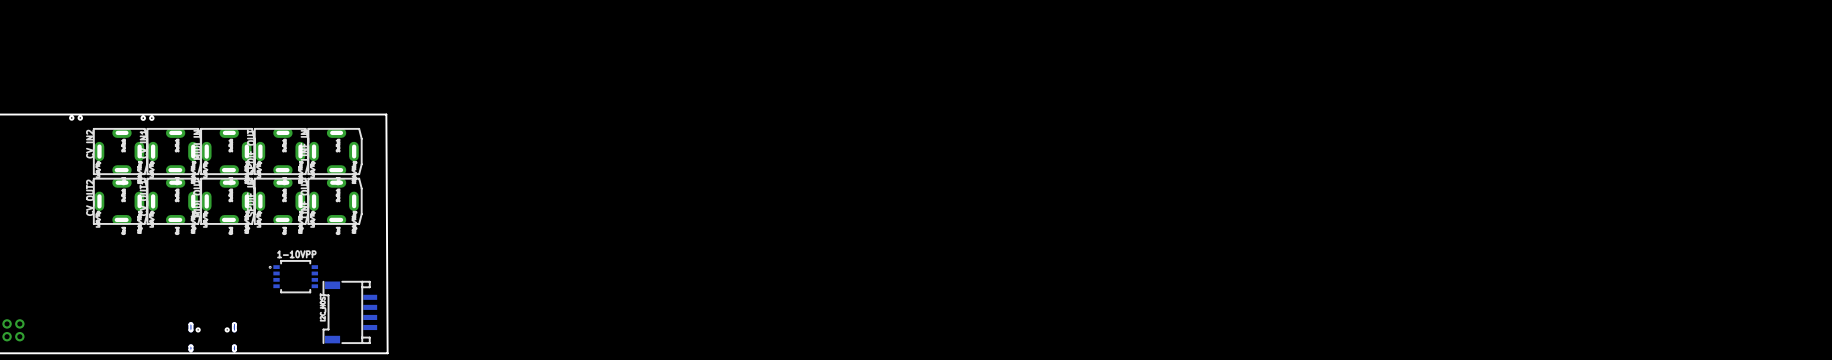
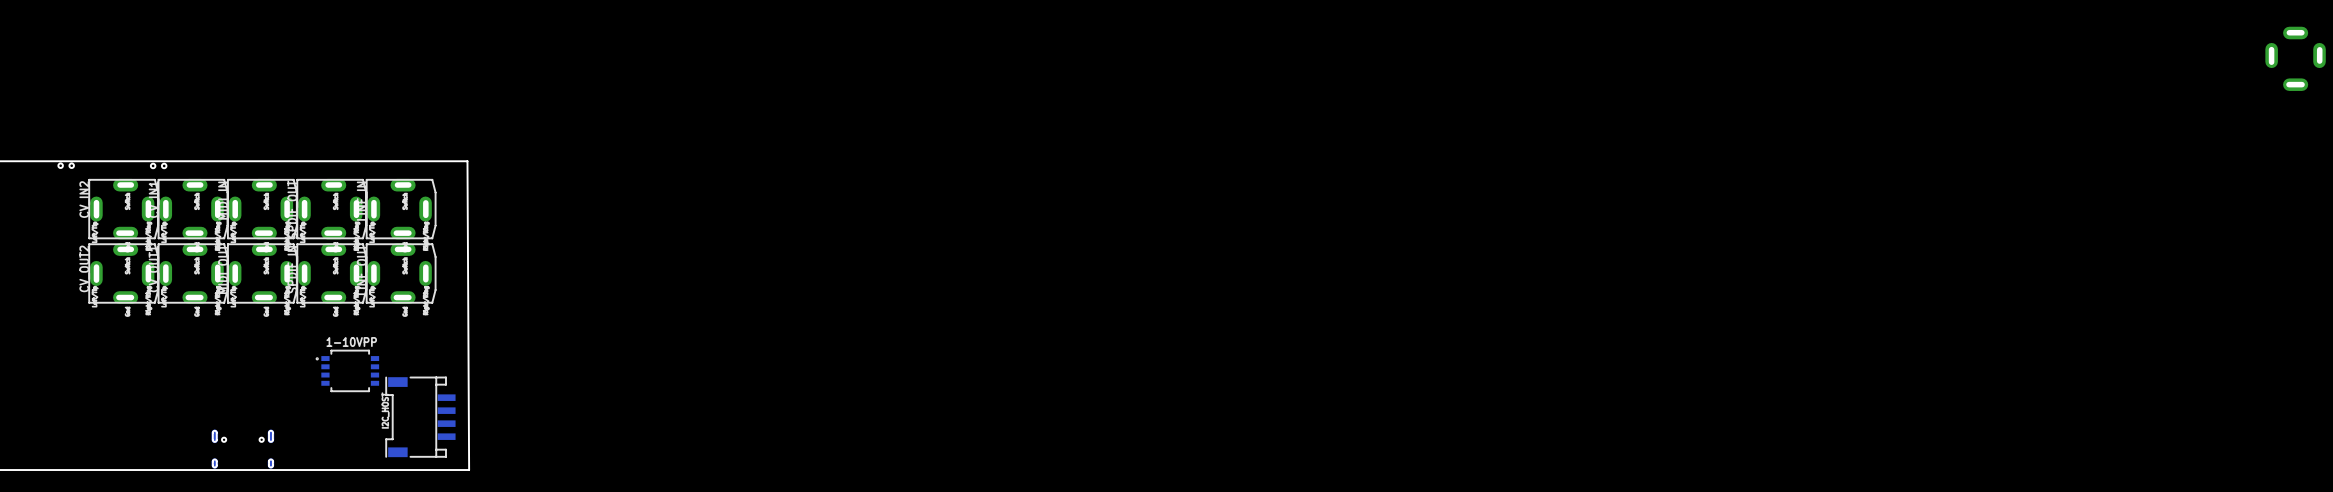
part: none -> (2295, 58)

